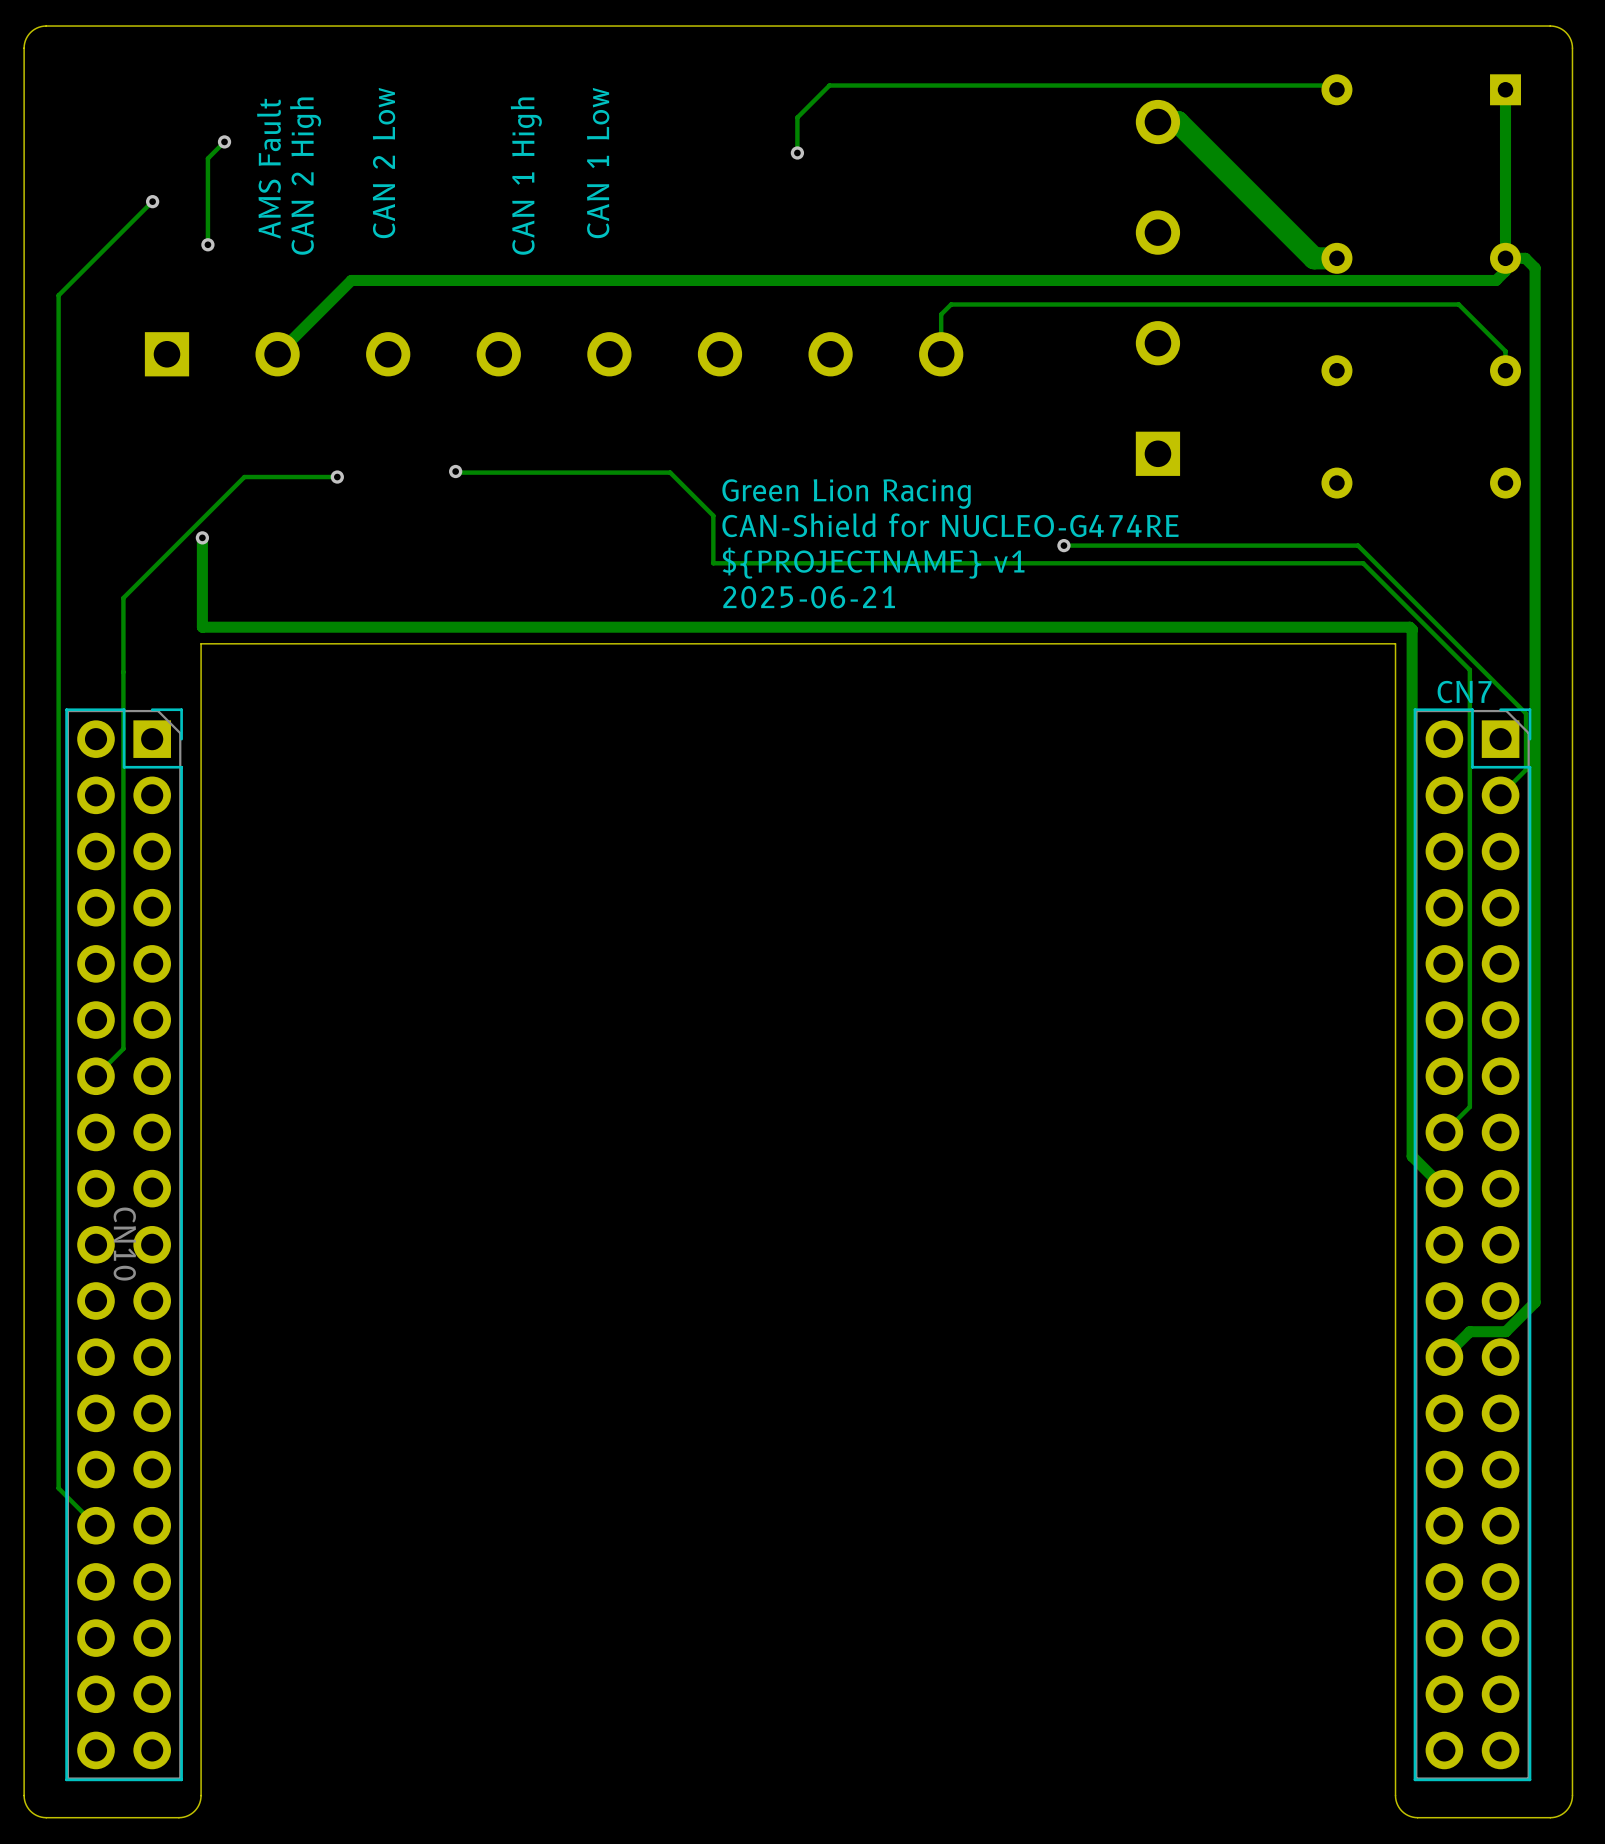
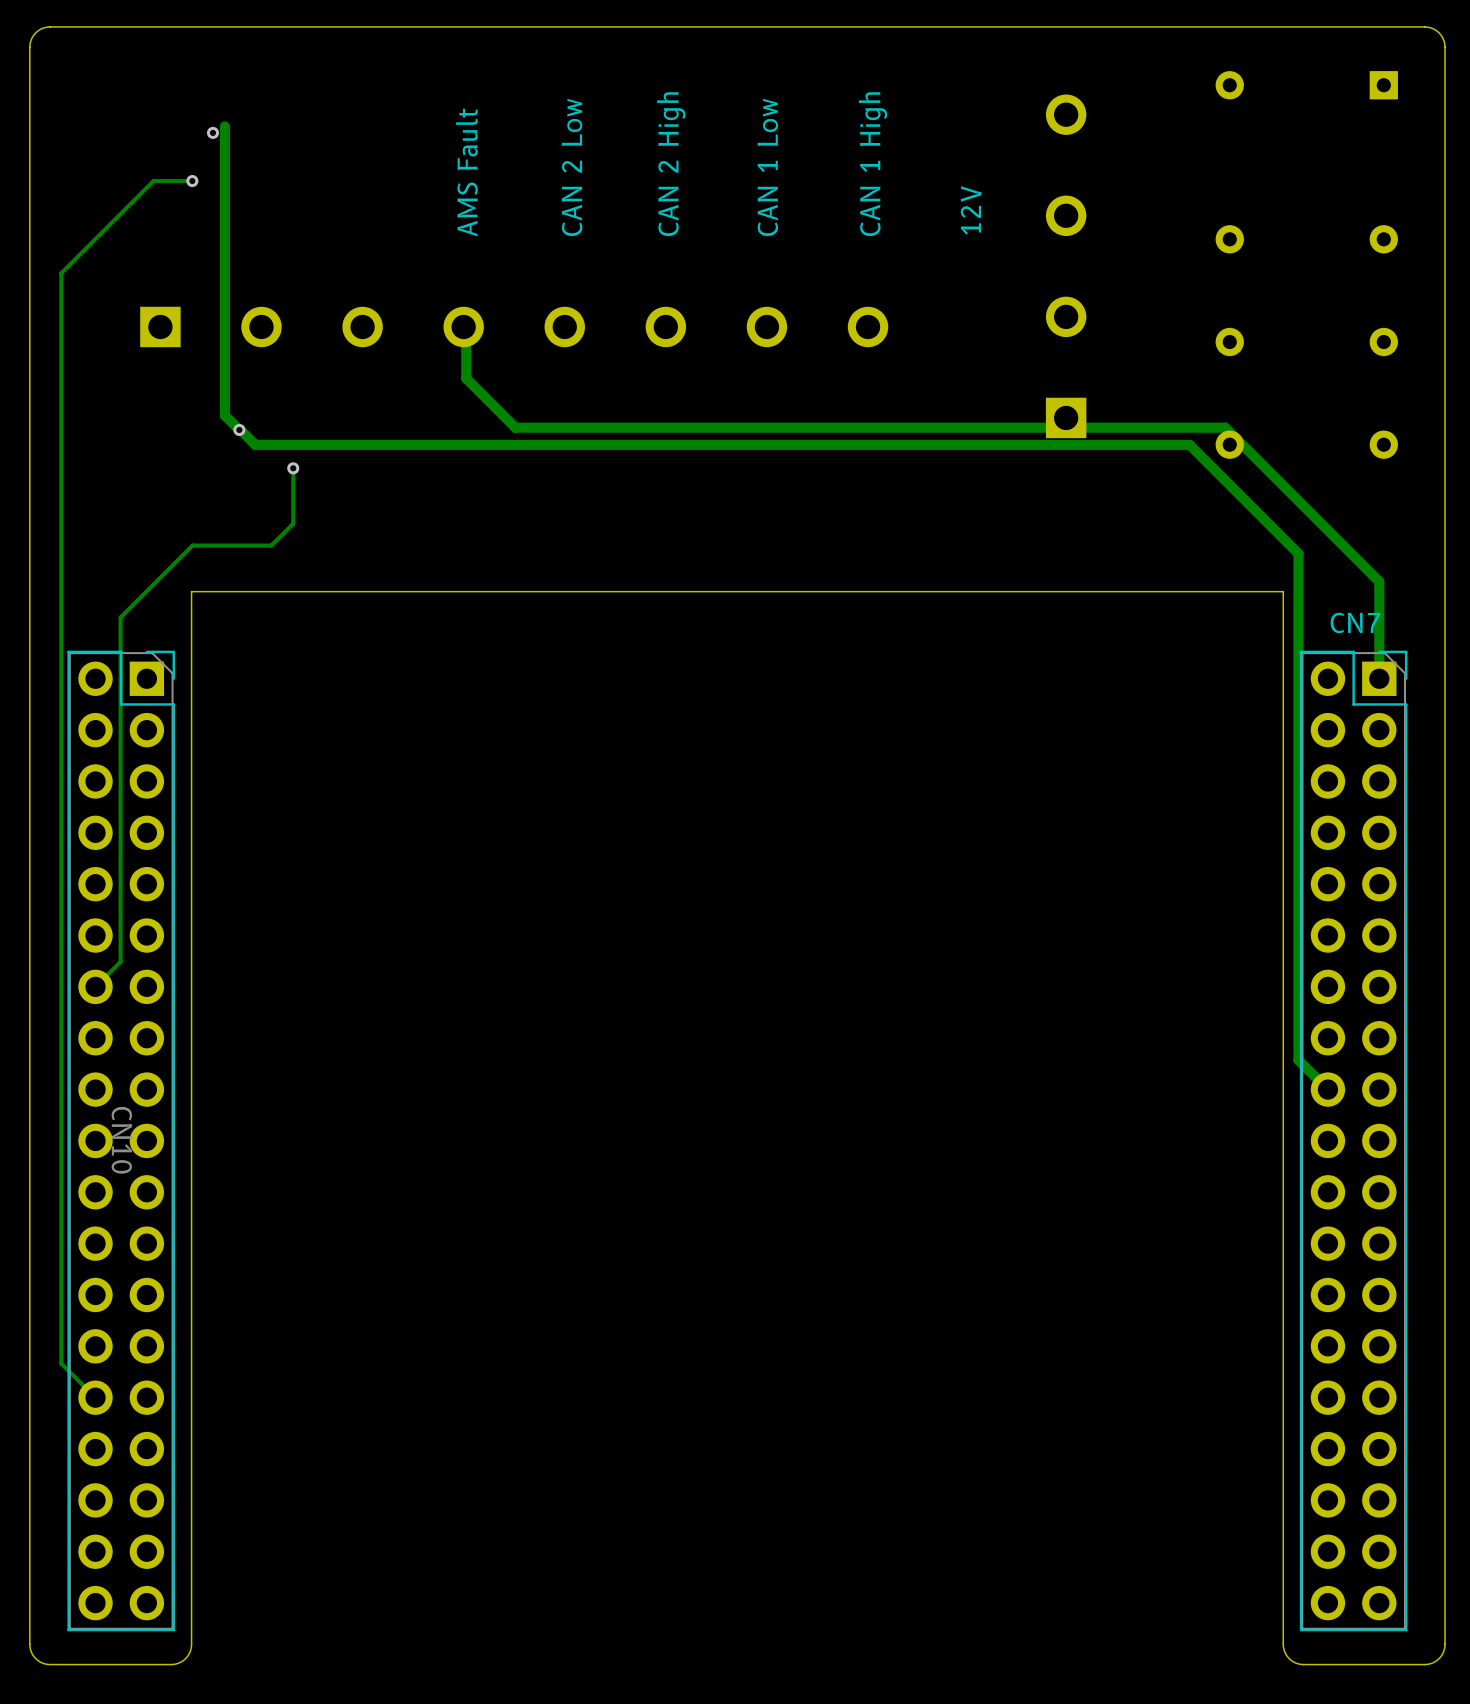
track: (1336, 89) (1332, 85) (829, 85) (797, 117) (797, 152) -> none
track: (1505, 89) (1505, 271) (1496, 280) (351, 280) (277, 354) -> none
track: (1157, 122) (1177, 122) (1314, 258) (1336, 258) -> none
track: (224, 141) (207, 158) (207, 244) -> none
via: (797, 152) -> none
text position: CAN 2 Low (384, 163) -> CAN 2 Low (572, 167)
text position: CAN 1 Low (598, 163) -> CAN 1 Low (767, 167)
text position: AMS Fault (268, 168) -> AMS Fault (466, 172)
text position: CAN 2 High (305, 176) -> CAN 2 High (671, 164)
text position: CAN 1 High (526, 176) -> CAN 1 High (872, 164)
track: none -> (192, 181) (153, 181) (147, 187)
via: none -> (192, 181)
via: (152, 201) -> none
text: none -> 12V (971, 210)
via: (207, 244) -> none
track: (1505, 258) (1525, 258) (1535, 268) (1535, 1302) (1505, 1331) (1469, 1331) (1444, 1357) -> none
track: (941, 354) (941, 314) (951, 304) (1458, 304) (1505, 351) (1505, 370) -> none
track: none -> (466, 328) (466, 378) (515, 427) (1225, 427) (1379, 581) (1379, 678)
via: none -> (239, 429)
track: (455, 471) (670, 472) (713, 515) (713, 563) (1363, 563) (1469, 669) (1469, 1106) (1444, 1132) -> none
via: (455, 471) -> none
track: (337, 477) (244, 477) (123, 598) (123, 672) -> (293, 468) (293, 523) (271, 545) (192, 545) (120, 617)
via position: (337, 477) -> (293, 468)
text: Green Lion Racing (846, 494) -> none
text: CAN-Shield for NUCLEO-G474RE (950, 525) -> none
track: (202, 537) (202, 627) (1409, 627) (1412, 629) -> (224, 126) (224, 415) (255, 444) (1189, 444) (1298, 553) (1298, 578)
via: (202, 537) -> none
track: (1063, 545) (1358, 545) (1526, 713) (1526, 769) (1500, 795) -> none
via: (1063, 545) -> none
text: ${PROJECTNAME} v1 (873, 563) -> none
text: 2025-06-21 (809, 597) -> none
CN7 name position: CN7 (1464, 691) -> CN7 (1355, 622)

